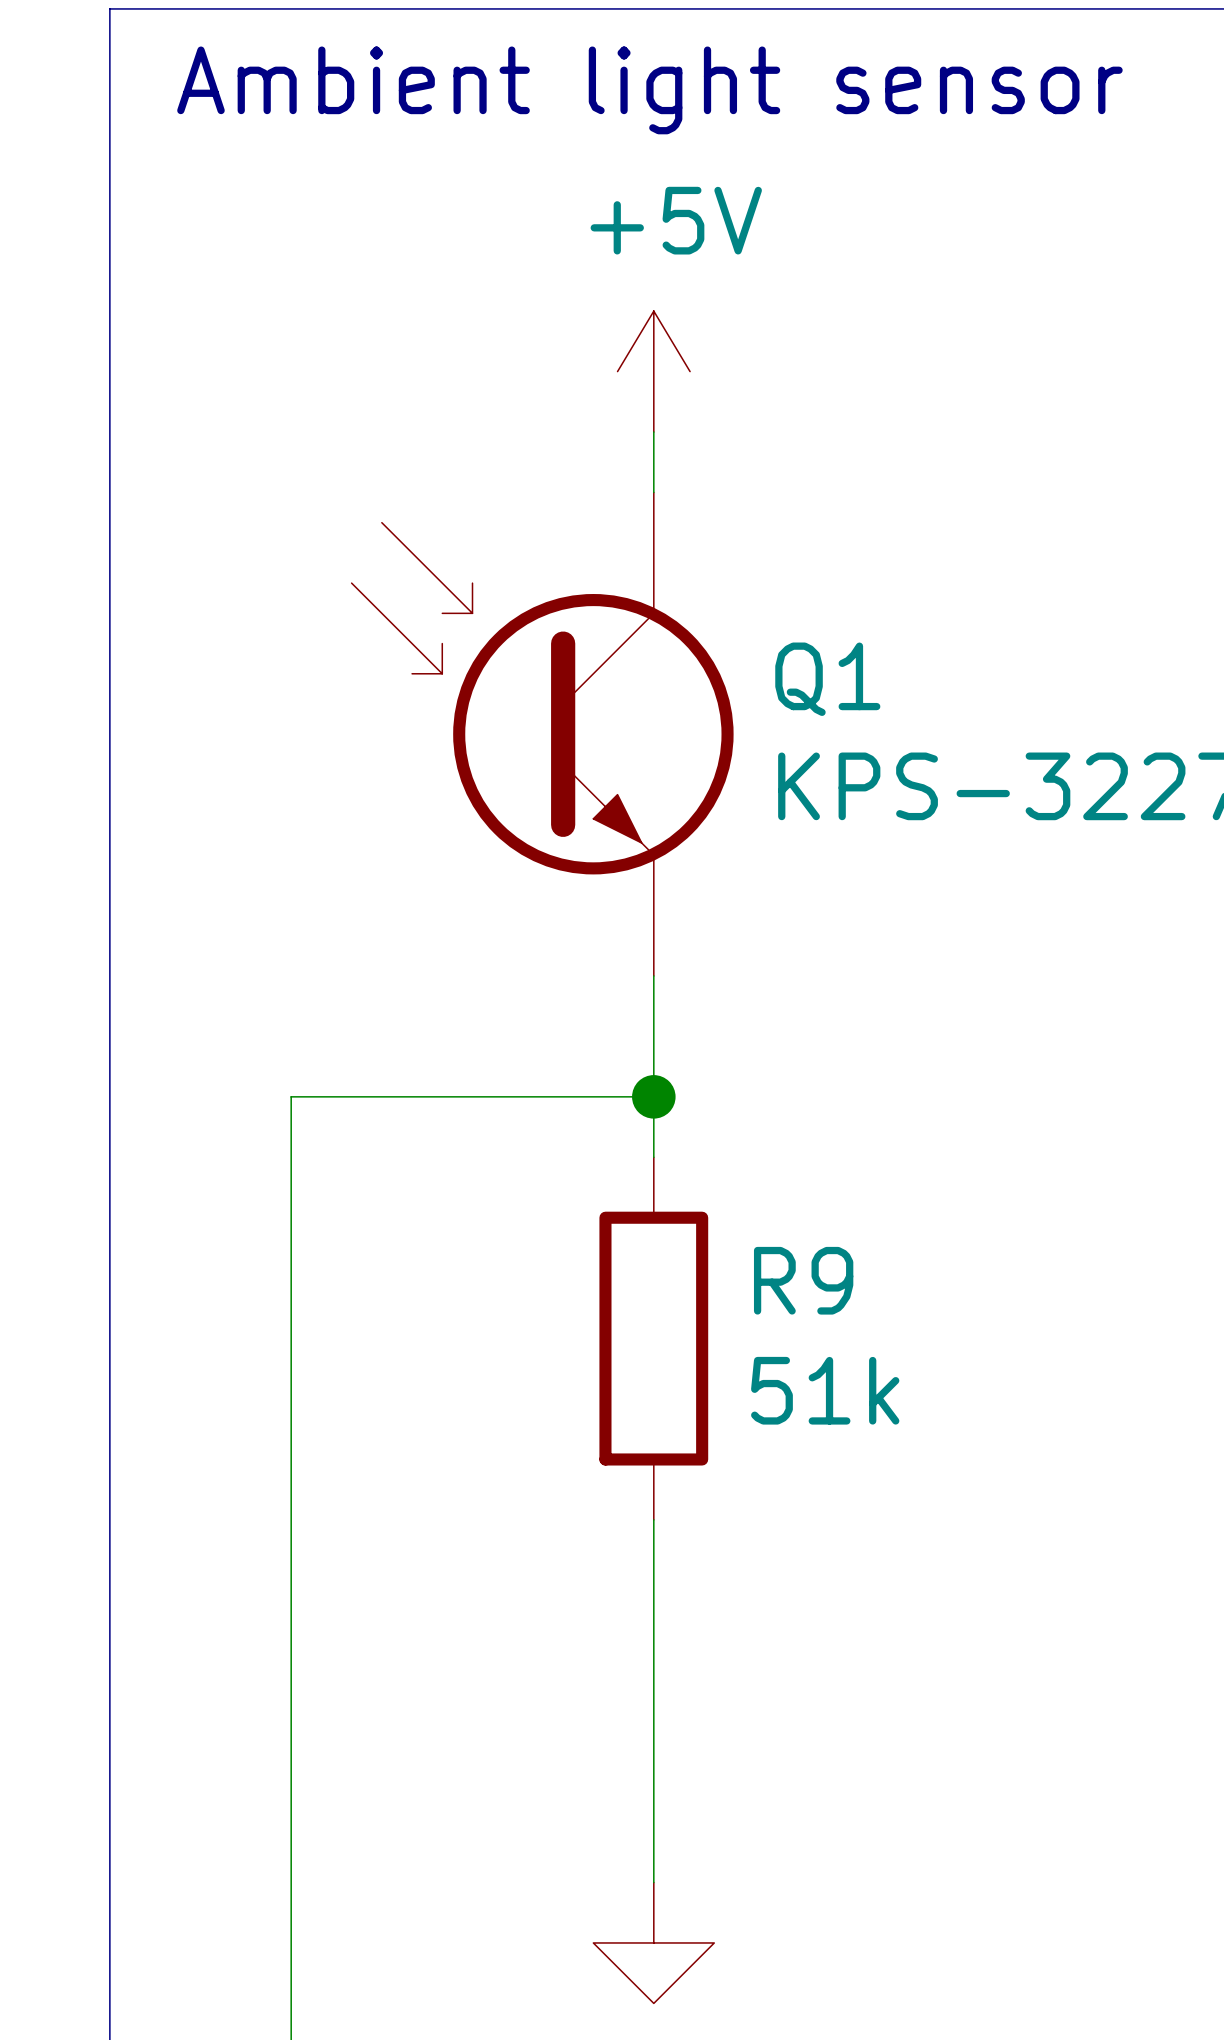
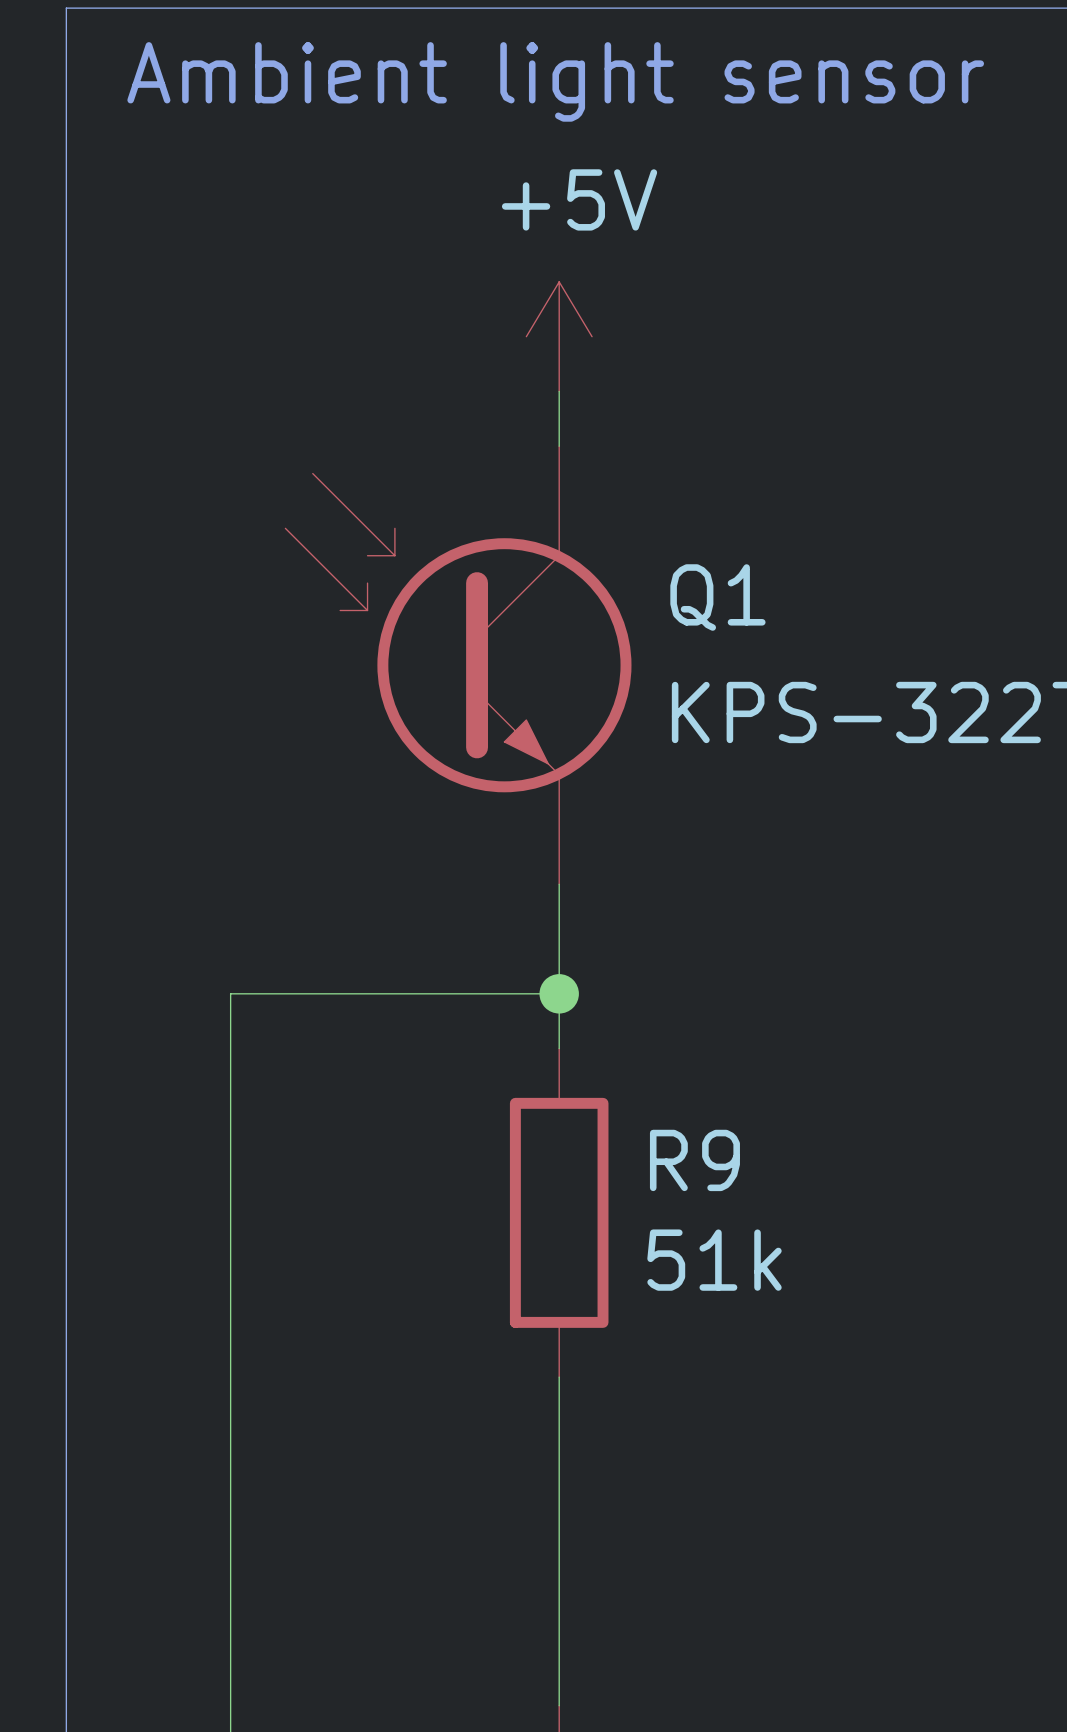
Q1 name position: Q1 (827, 679) -> Q1 (717, 597)

